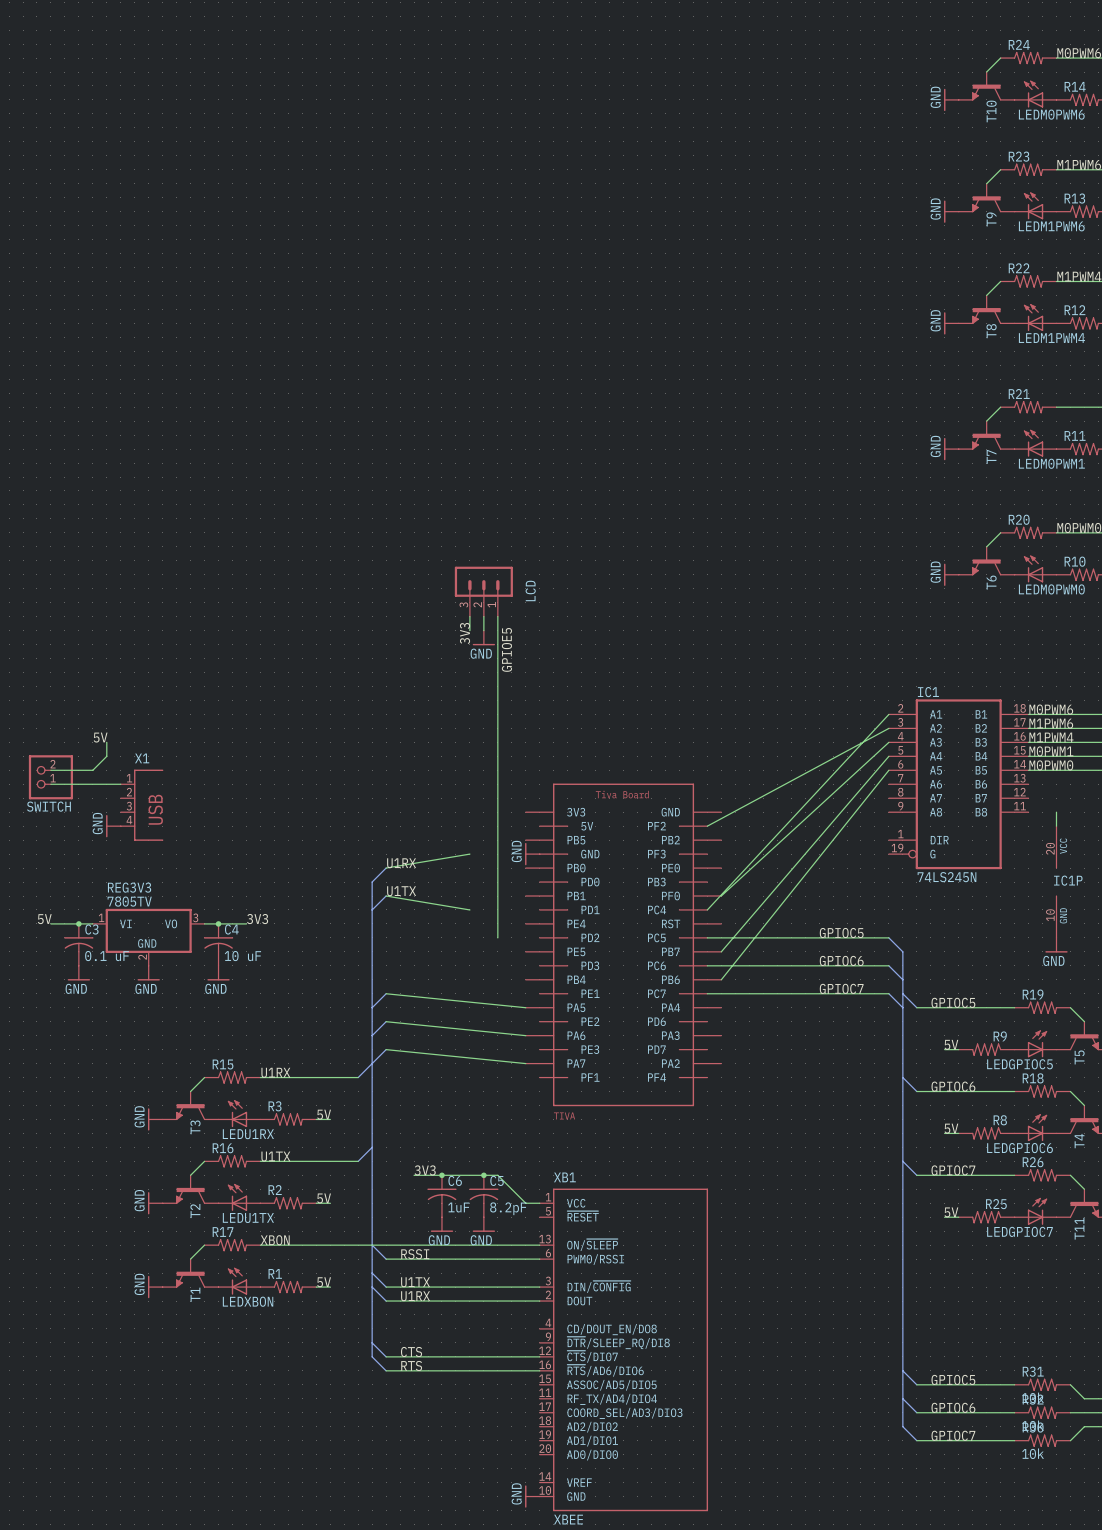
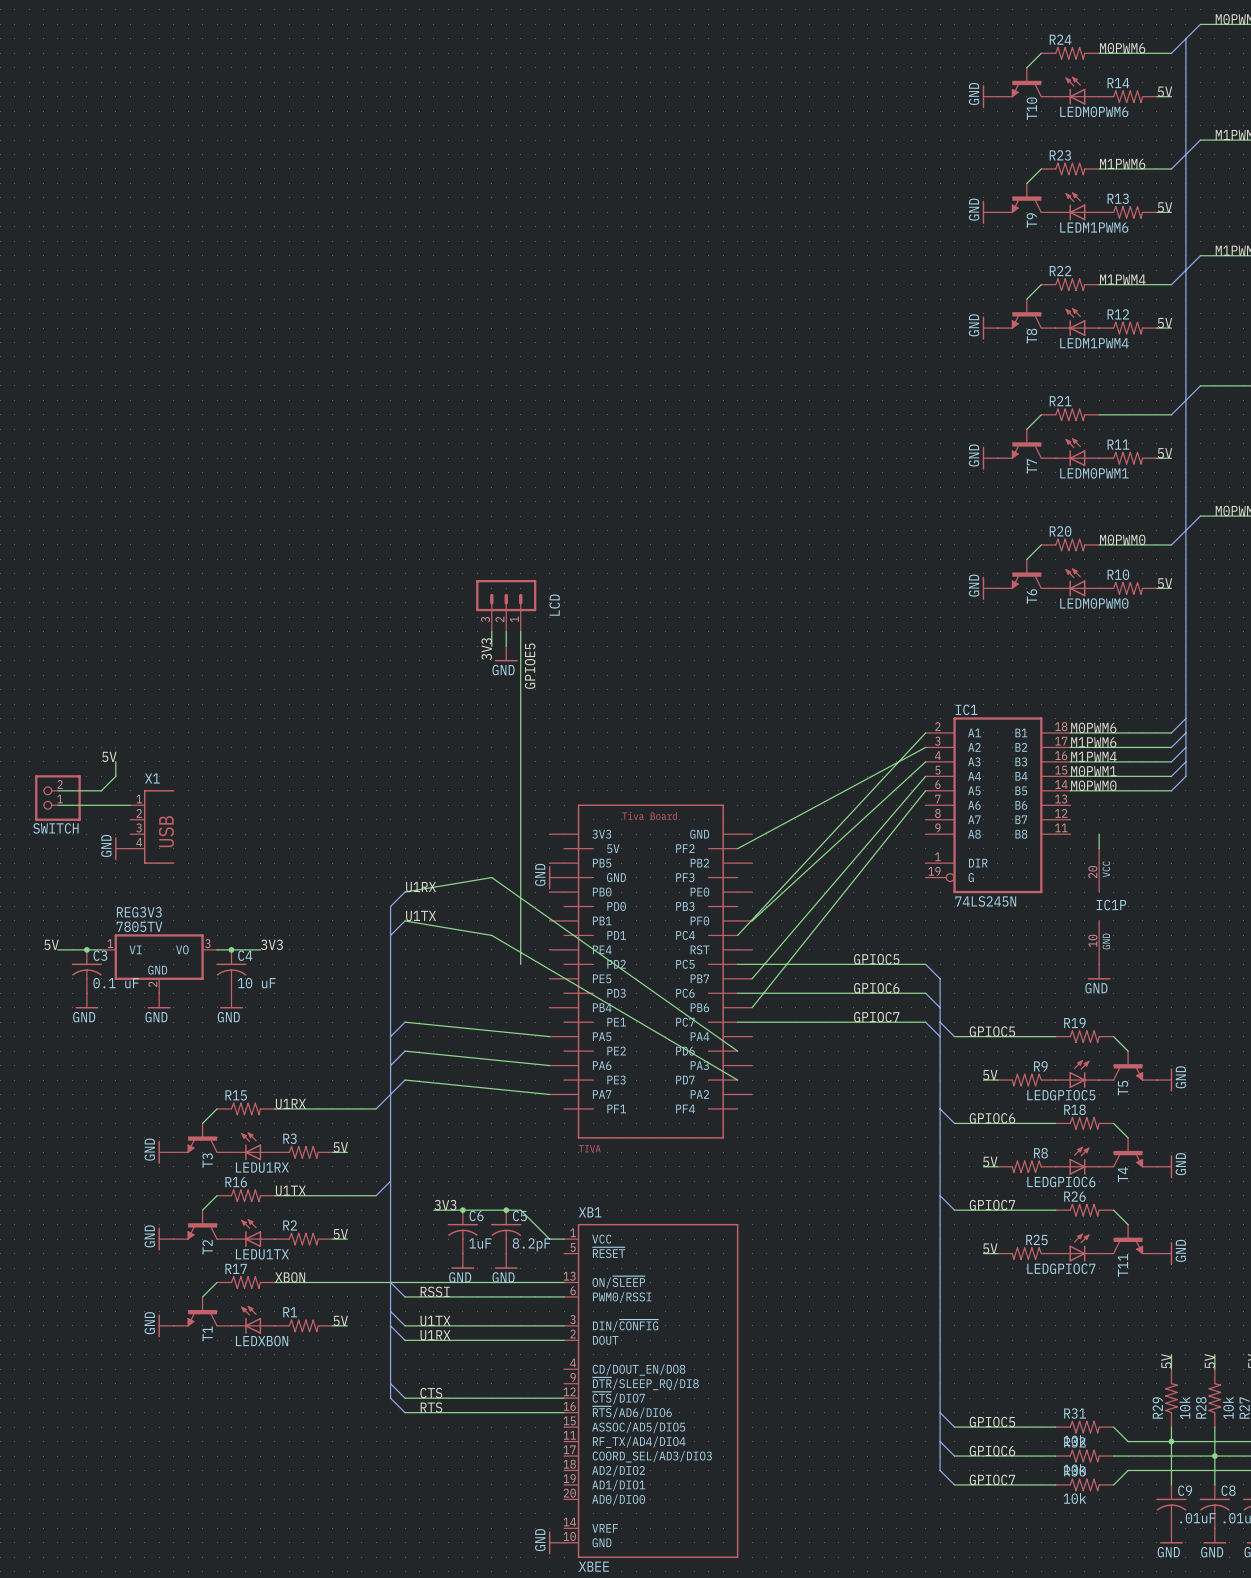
wire: none -> (491, 877) (737, 1051)
wire: none -> (491, 935) (737, 1080)

